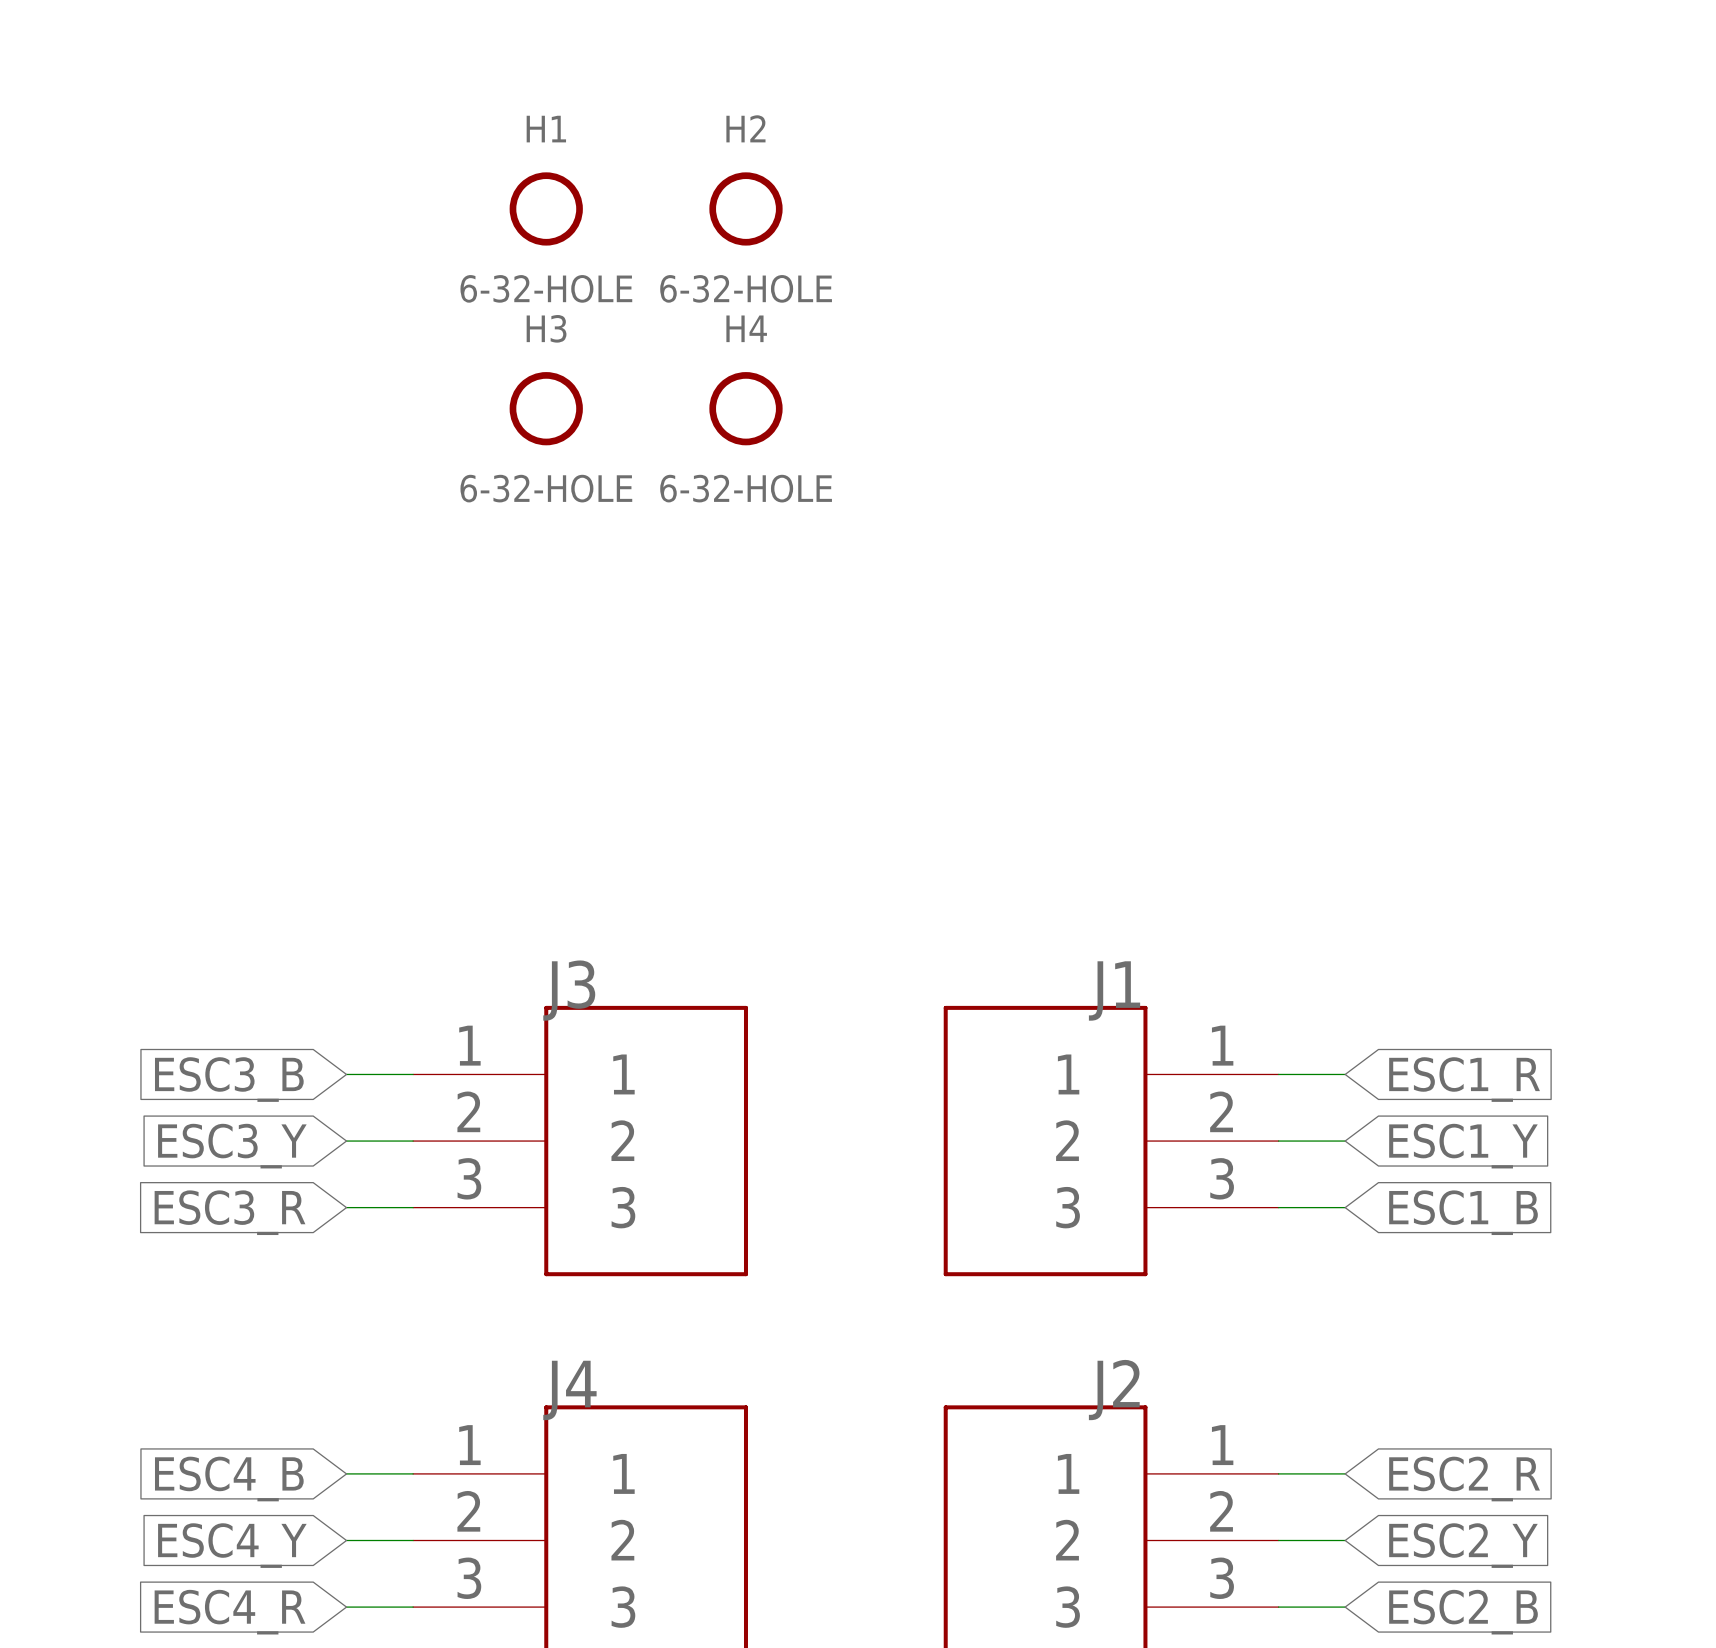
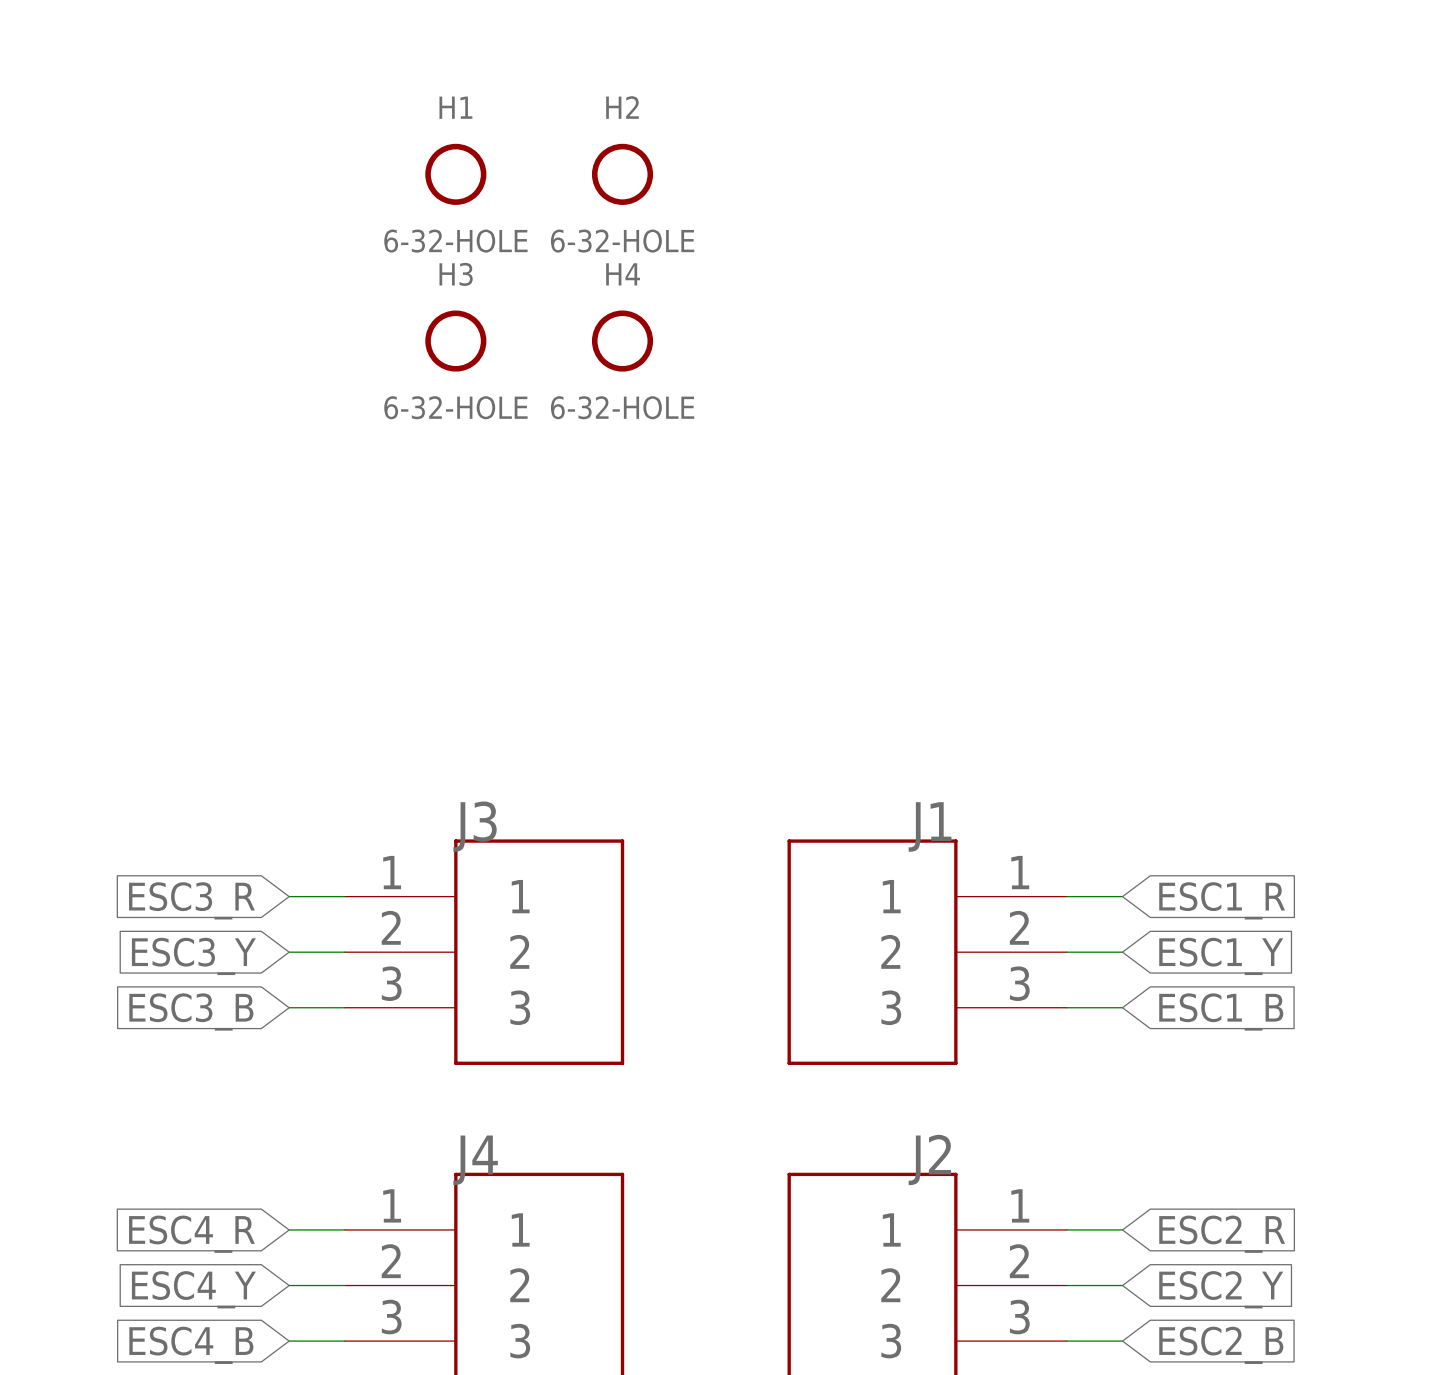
global label: ESC3_B (229, 1079) -> ESC3_R (191, 900)
global label: ESC3_R (230, 1212) -> ESC3_B (191, 1011)
global label: ESC4_B (229, 1479) -> ESC4_R (191, 1234)
global label: ESC4_R (230, 1612) -> ESC4_B (191, 1345)

